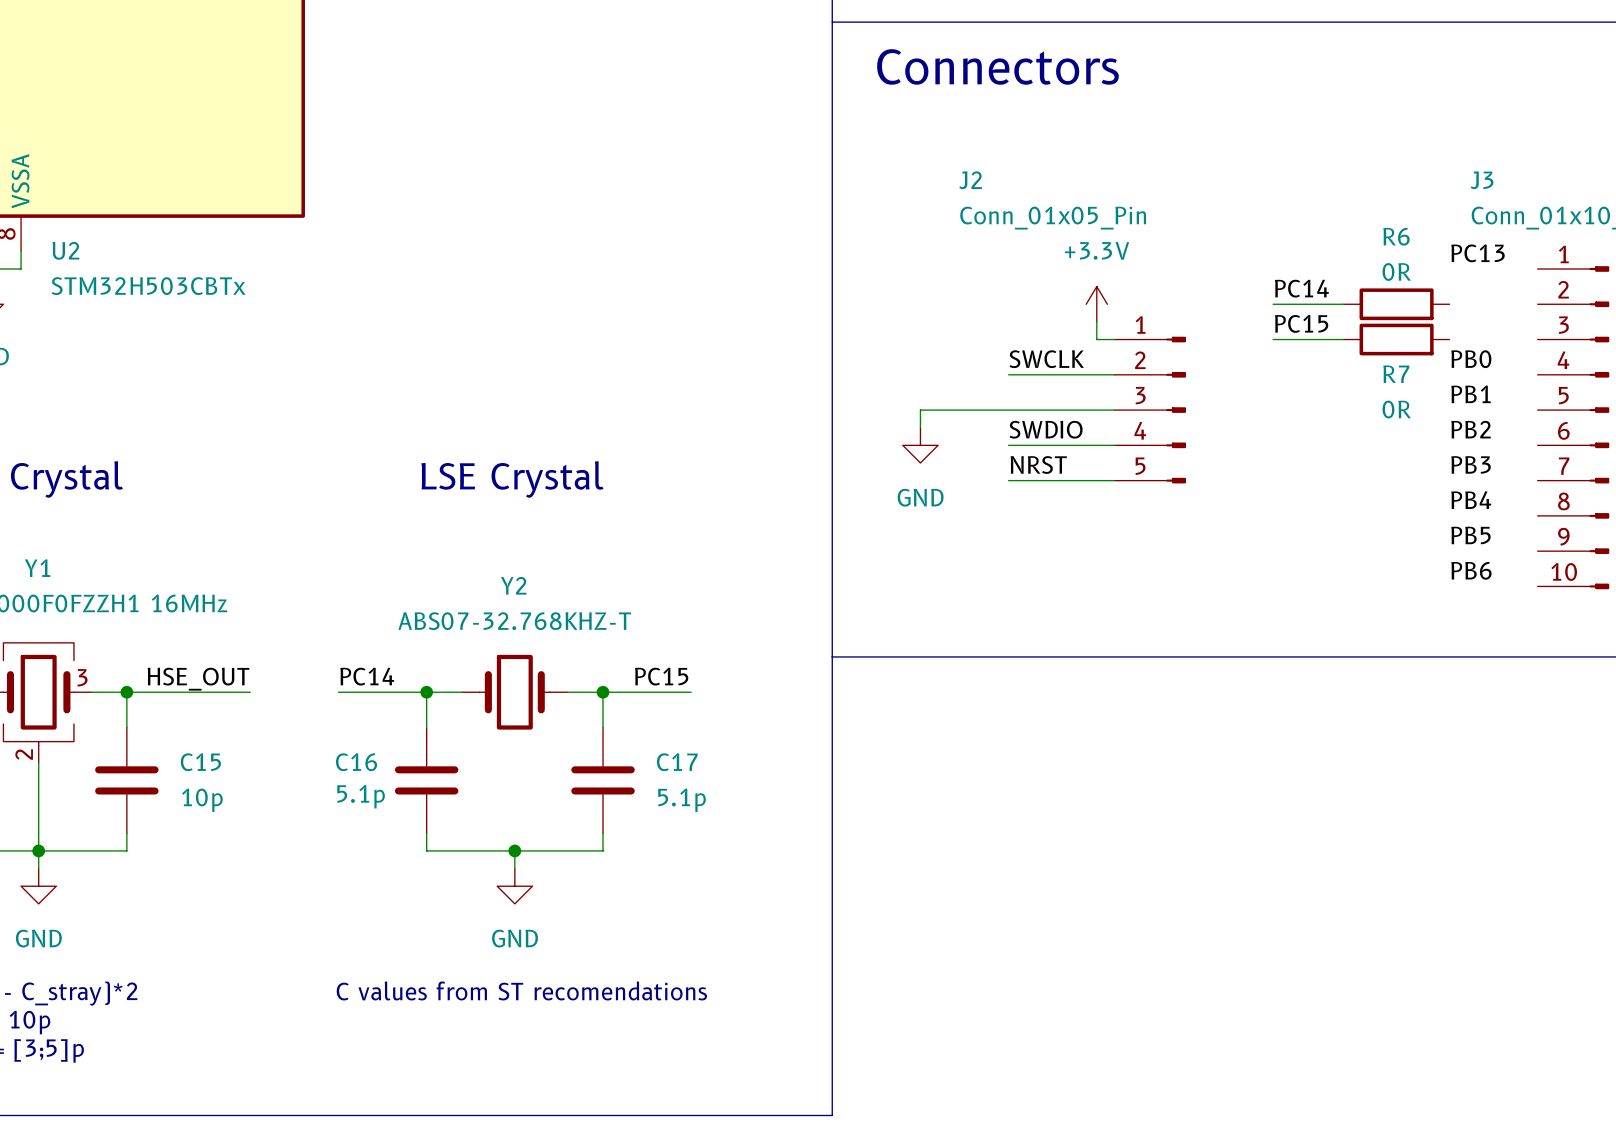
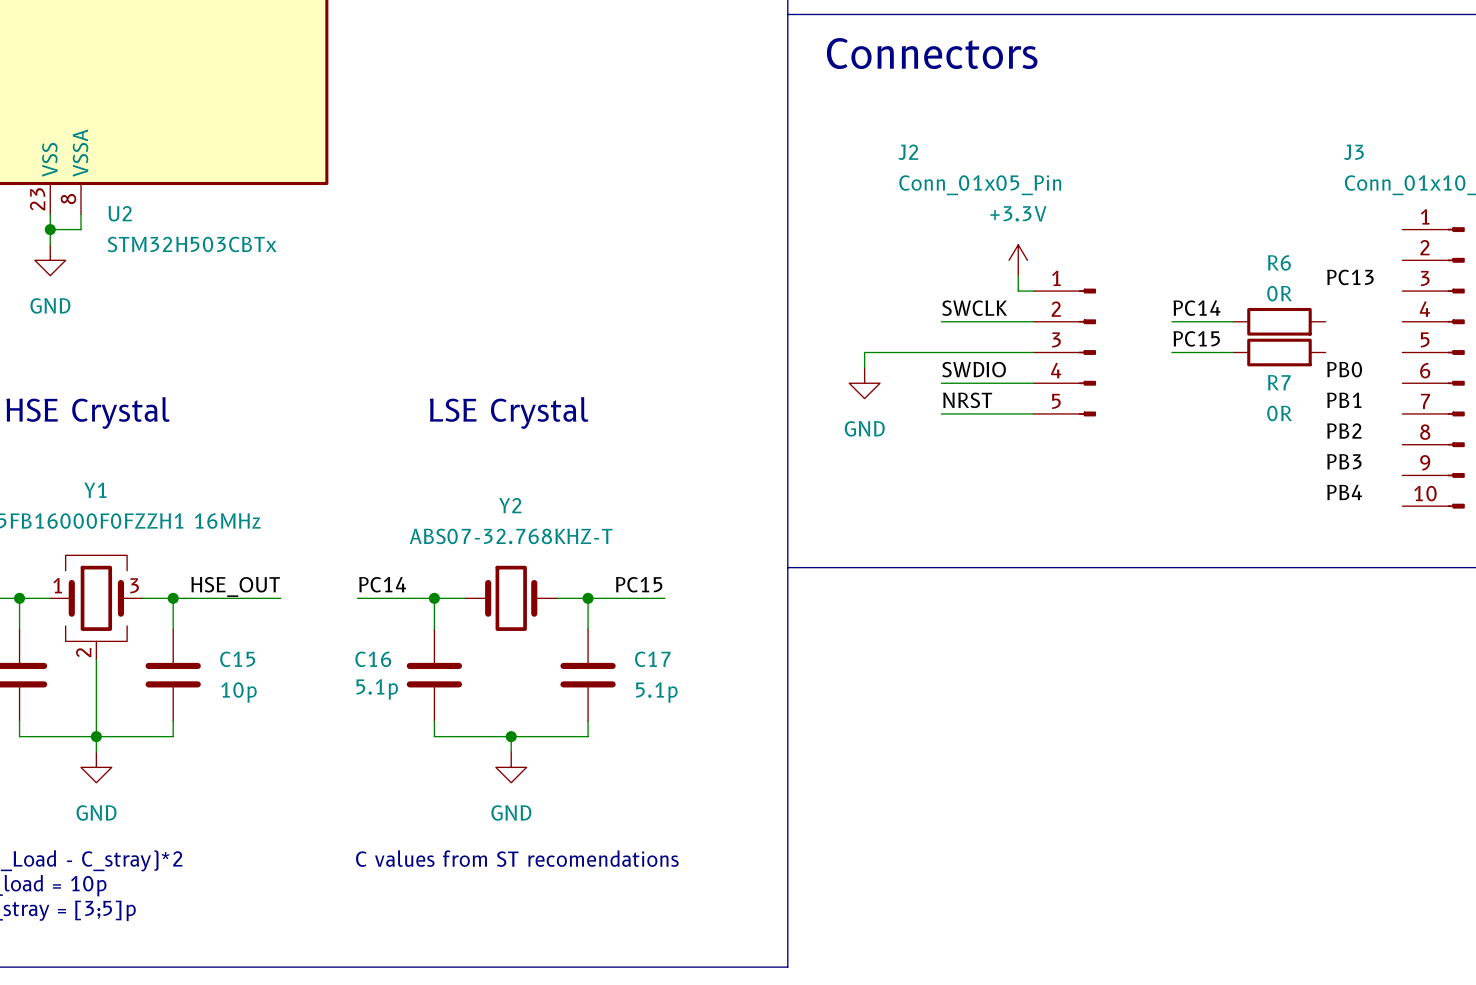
label position: PC13 (1477, 253) -> PC13 (1350, 277)
label position: PC14 (1301, 288) -> PC14 (1196, 308)
wire: (1273, 304) (1343, 304) -> (1171, 321) (1233, 321)
R6 position: (1396, 304) -> (1279, 321)
label position: PC15 (1301, 323) -> PC15 (1196, 338)
wire: (1273, 339) (1343, 339) -> (1171, 352) (1233, 352)
R7 position: (1396, 339) -> (1279, 352)
label: PB0 (1471, 359) -> none
label: PB1 (1470, 394) -> none
label: PB2 (1471, 429) -> PB0 (1344, 369)
label: PB3 (1471, 464) -> PB1 (1344, 400)
label: PB4 (1471, 500) -> PB2 (1344, 431)
label: PB5 (1470, 535) -> PB3 (1344, 461)
label: PB6 (1471, 570) -> PB4 (1344, 492)

